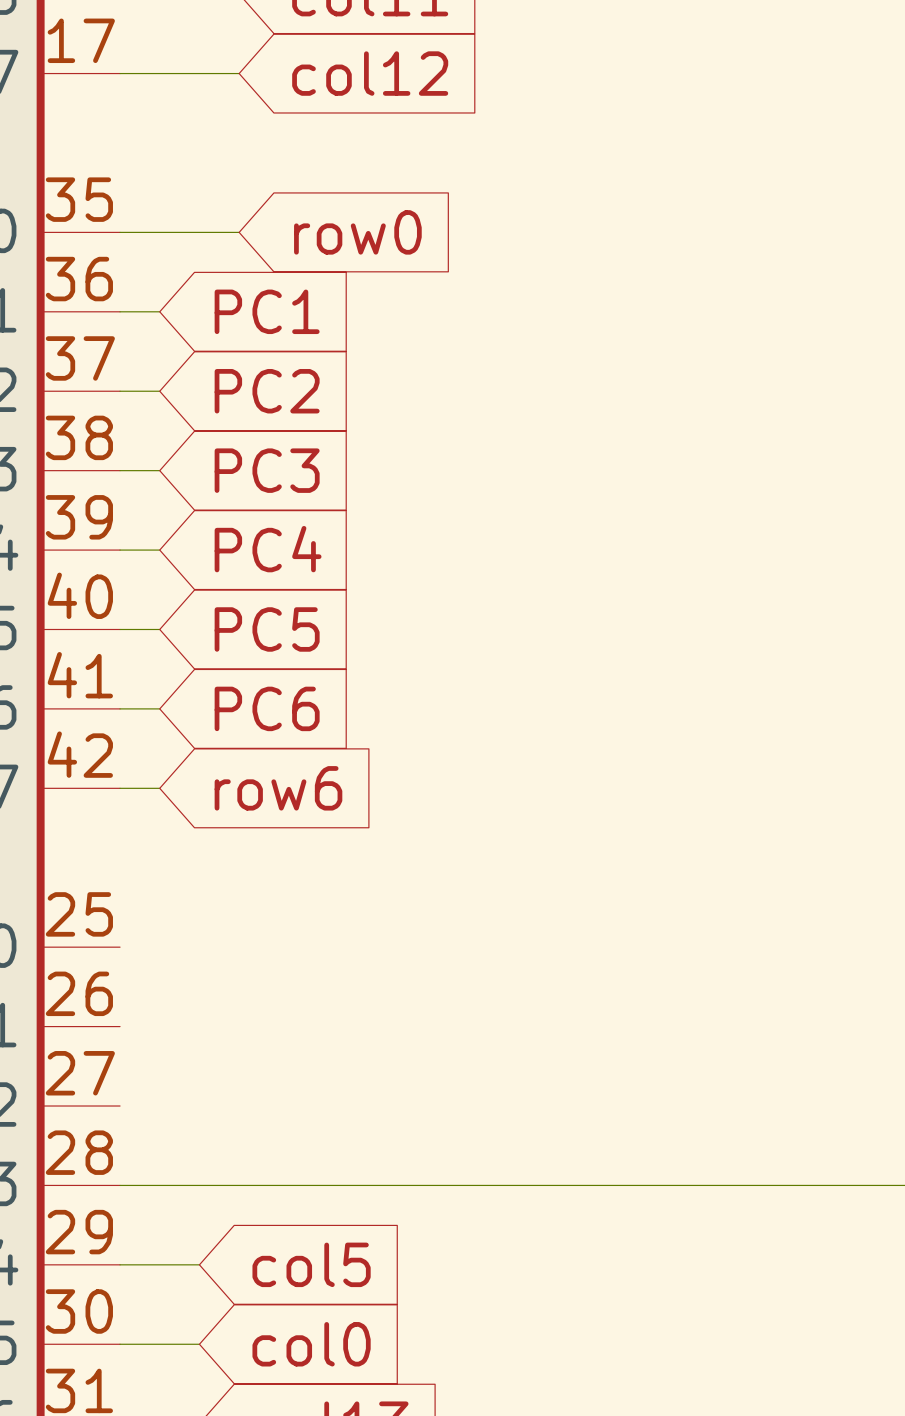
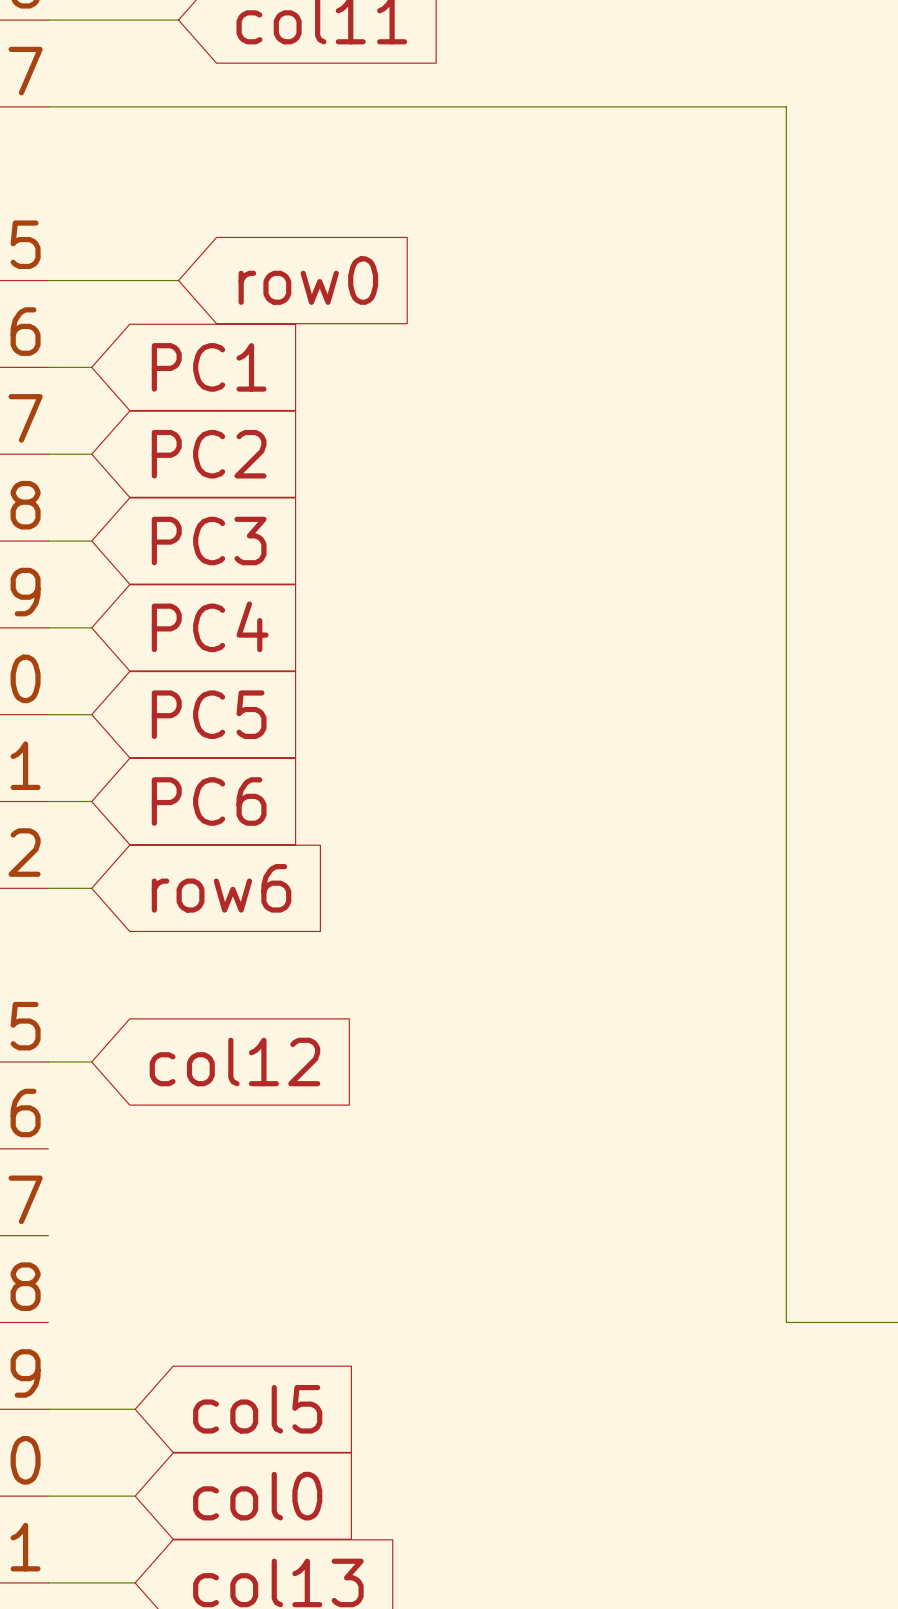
global label: col12 (370, 73) -> none
wire: none -> (48, 1061) (91, 1061)
global label: none -> col12 (234, 1061)
wire: (120, 1185) (795, 1185) -> (178, 106) (786, 106) (786, 1322)

